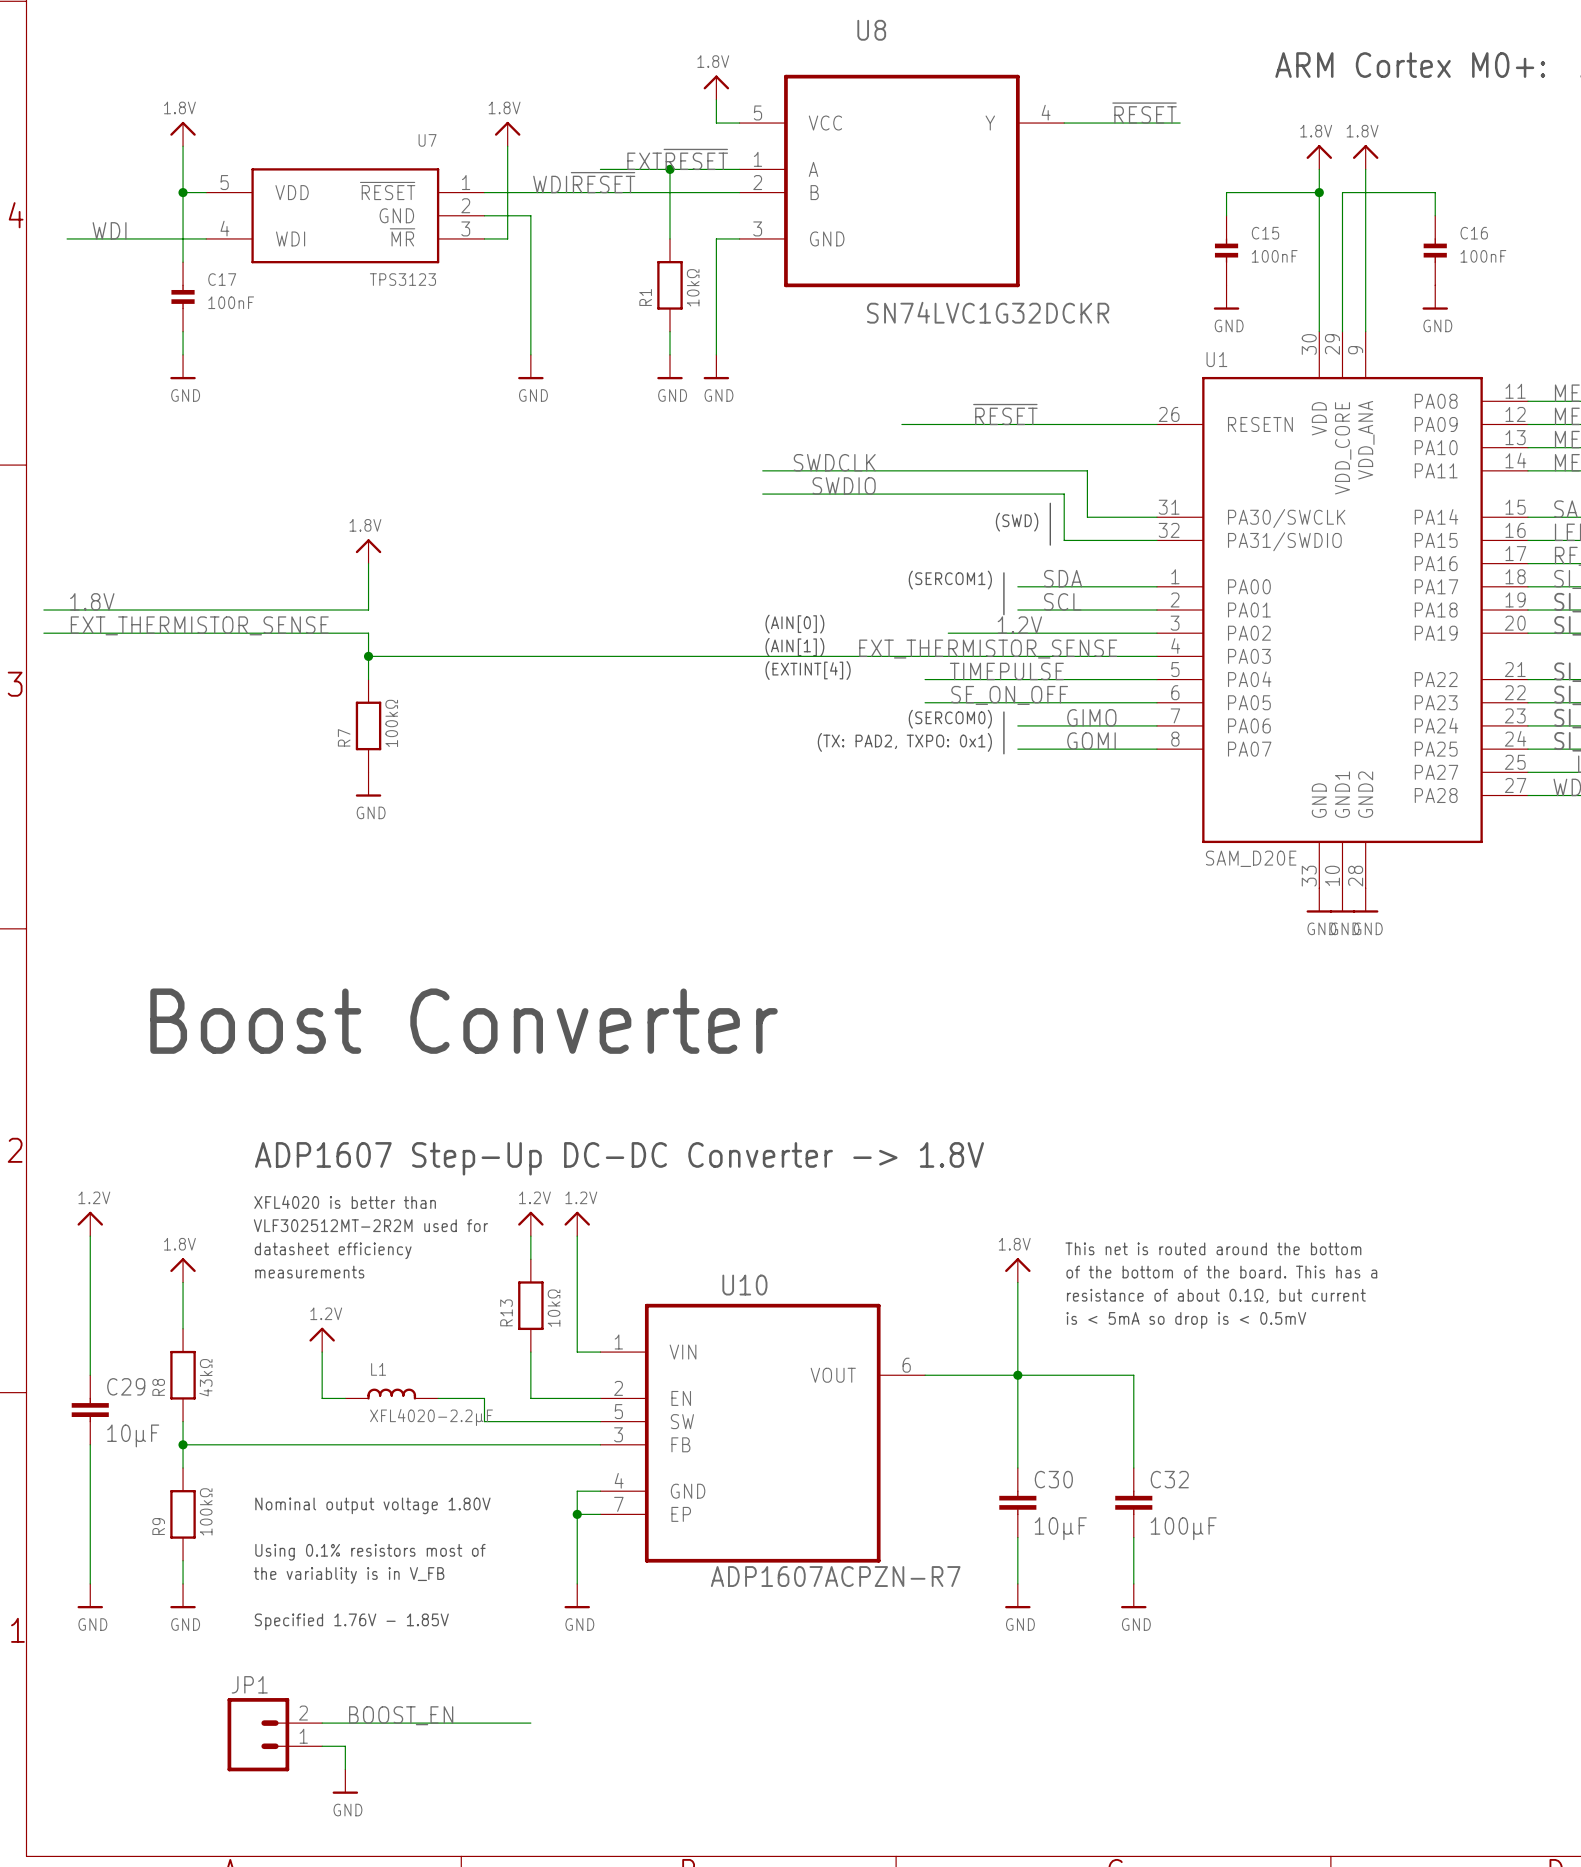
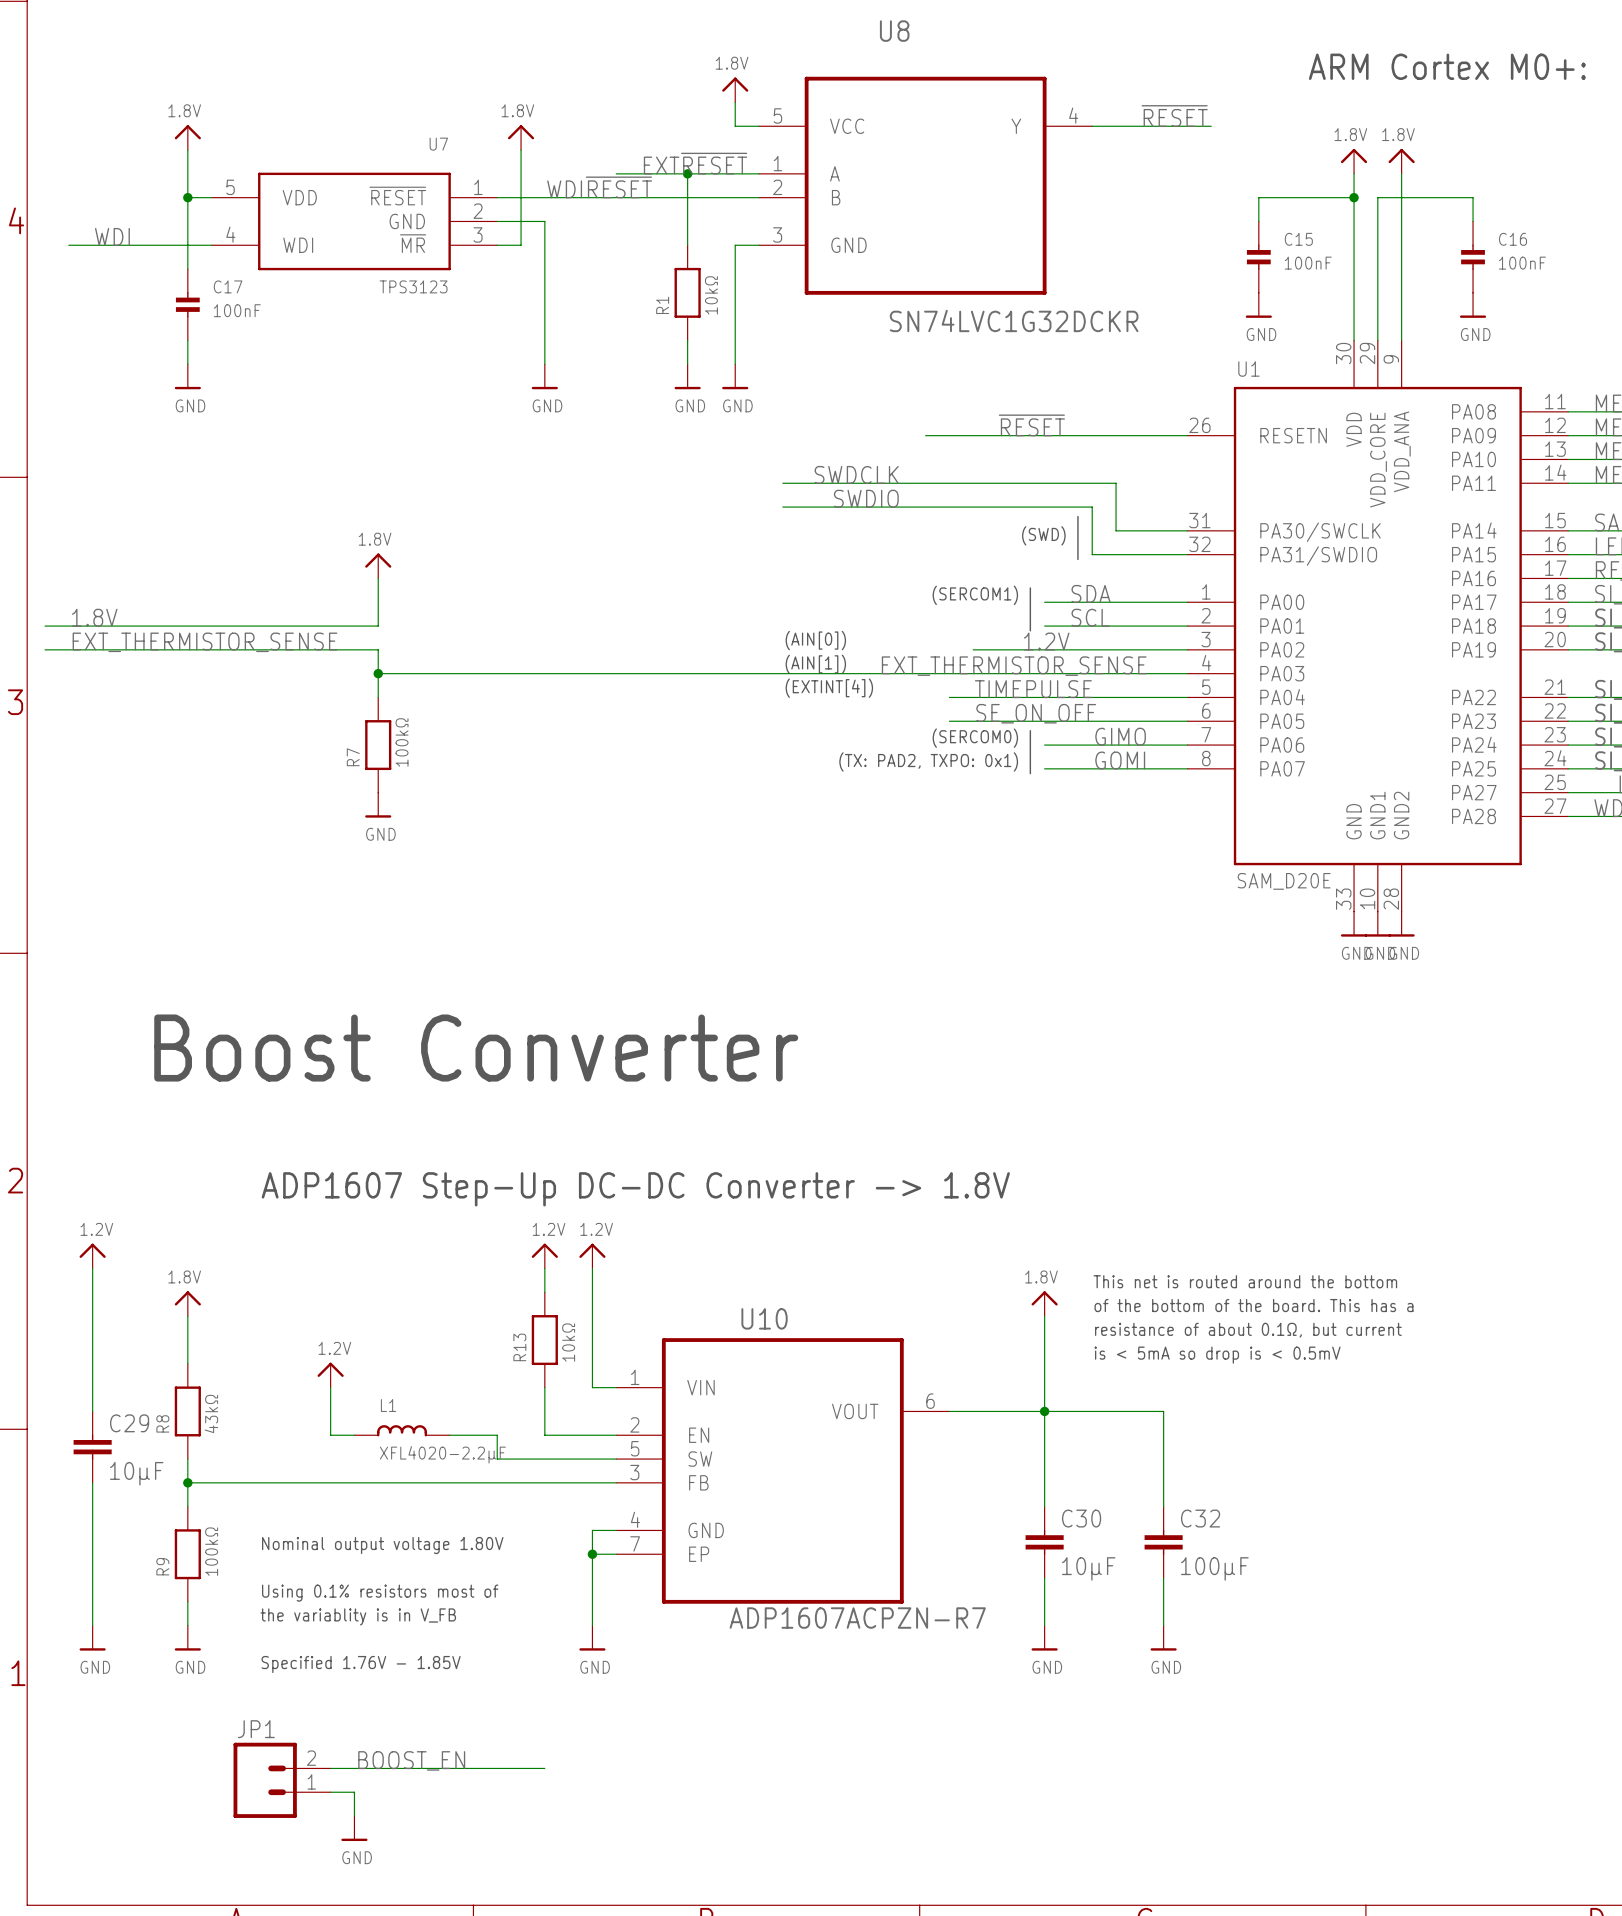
text: XFL4020 is better than (345, 1202) -> none
text: VLF302512MT-2R2M used for (370, 1225) -> none
text: datasheet efficiency (333, 1250) -> none
text: measurements (309, 1272) -> none

